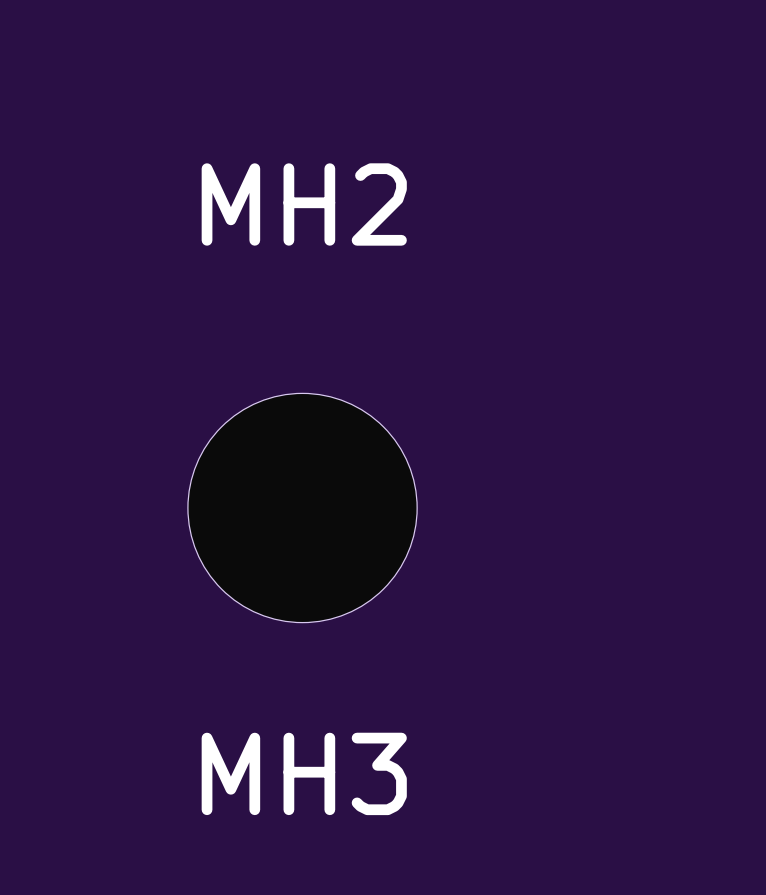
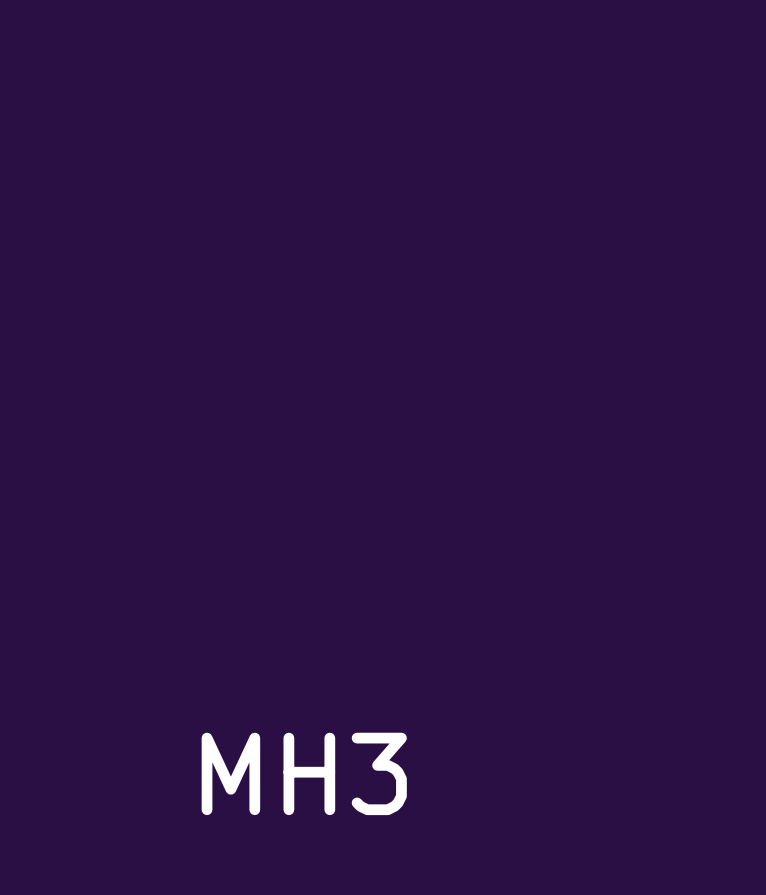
MH2: (302, 507) -> none

